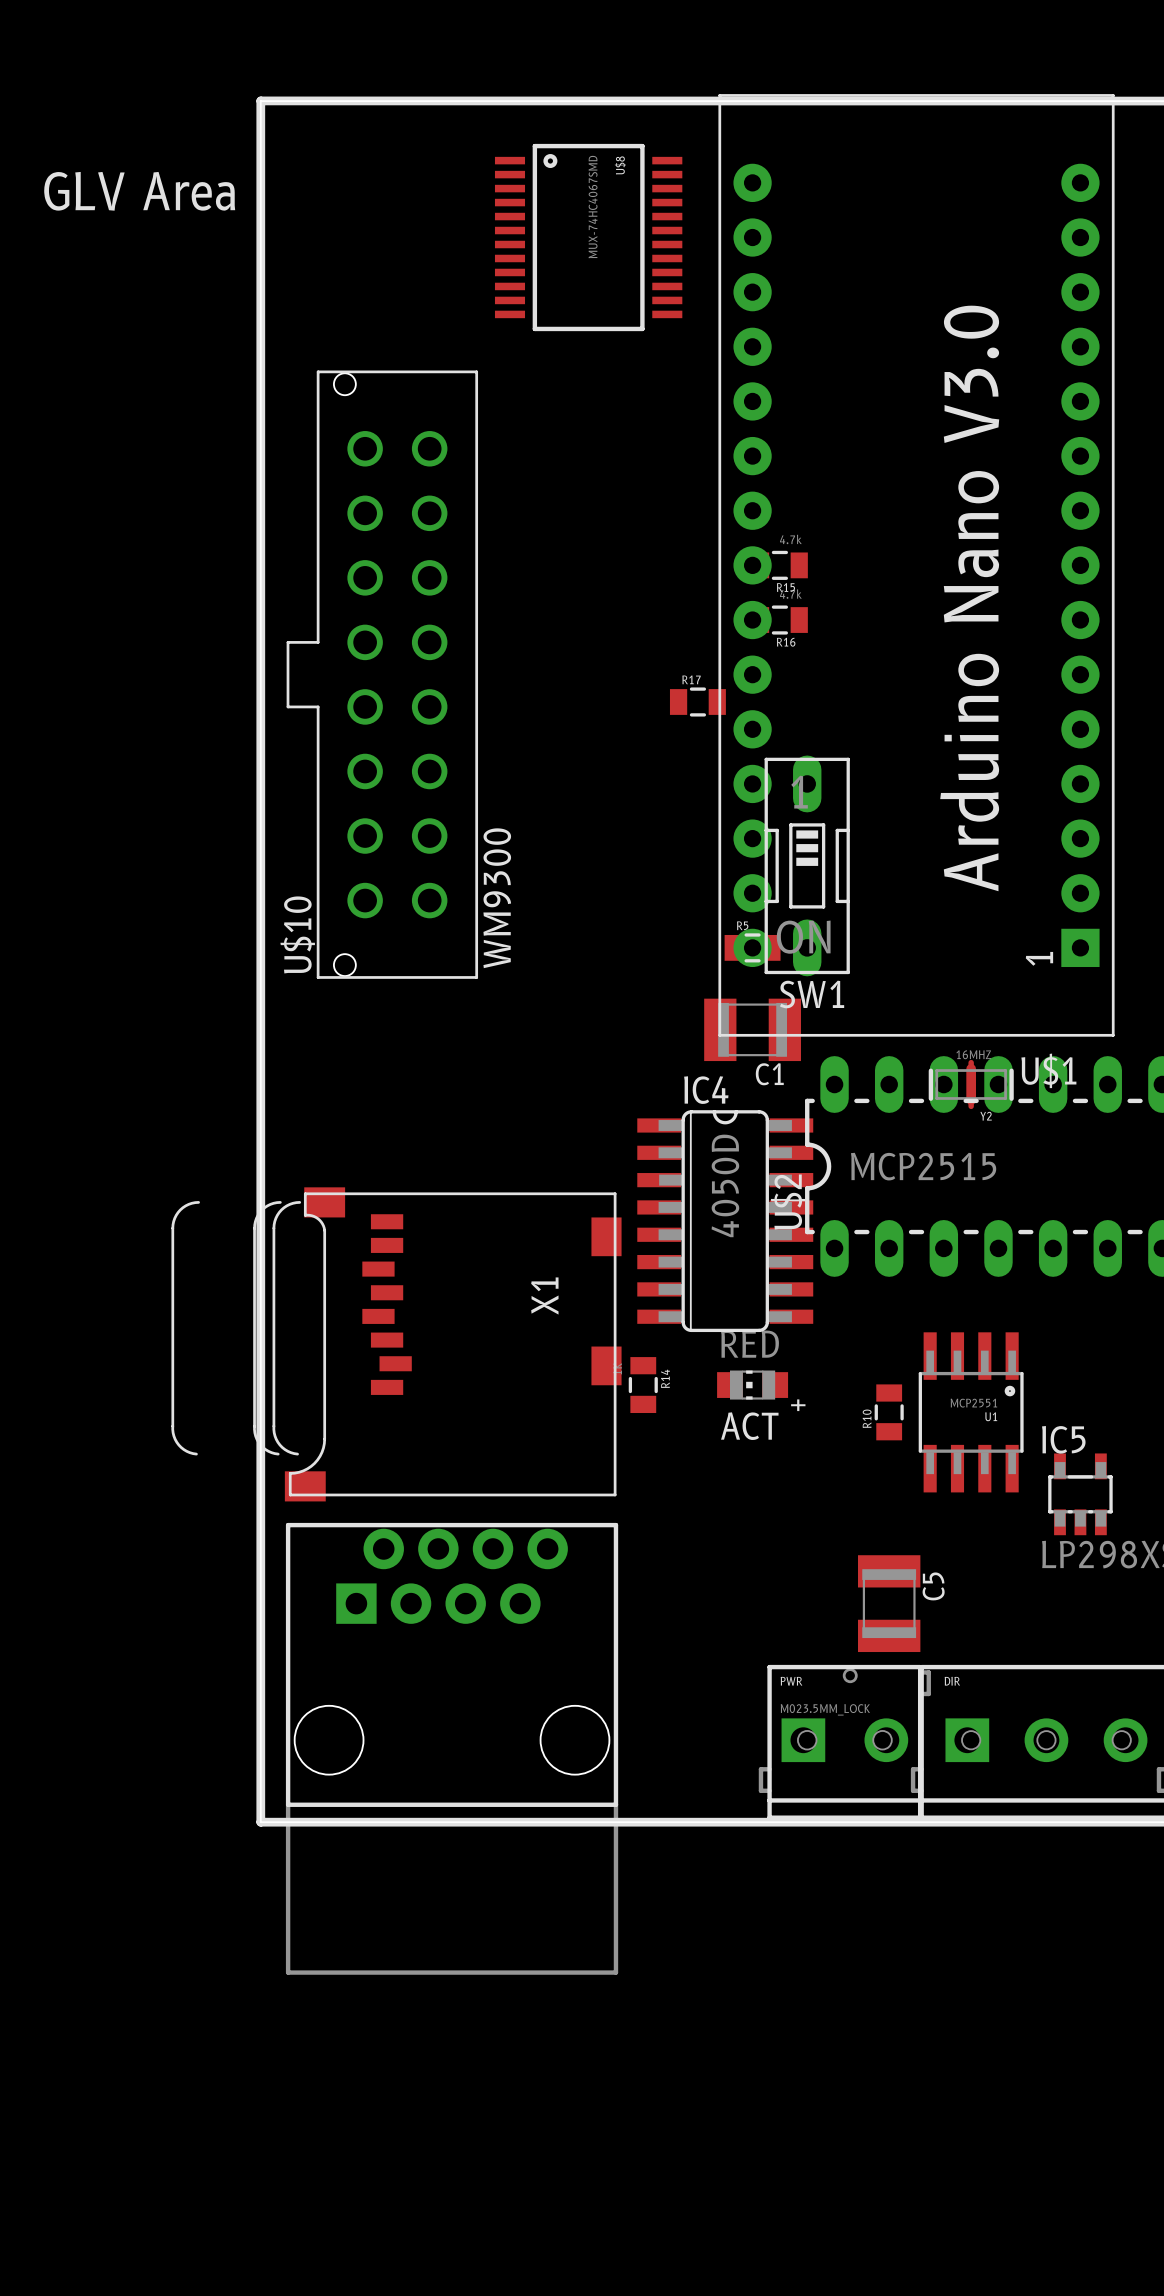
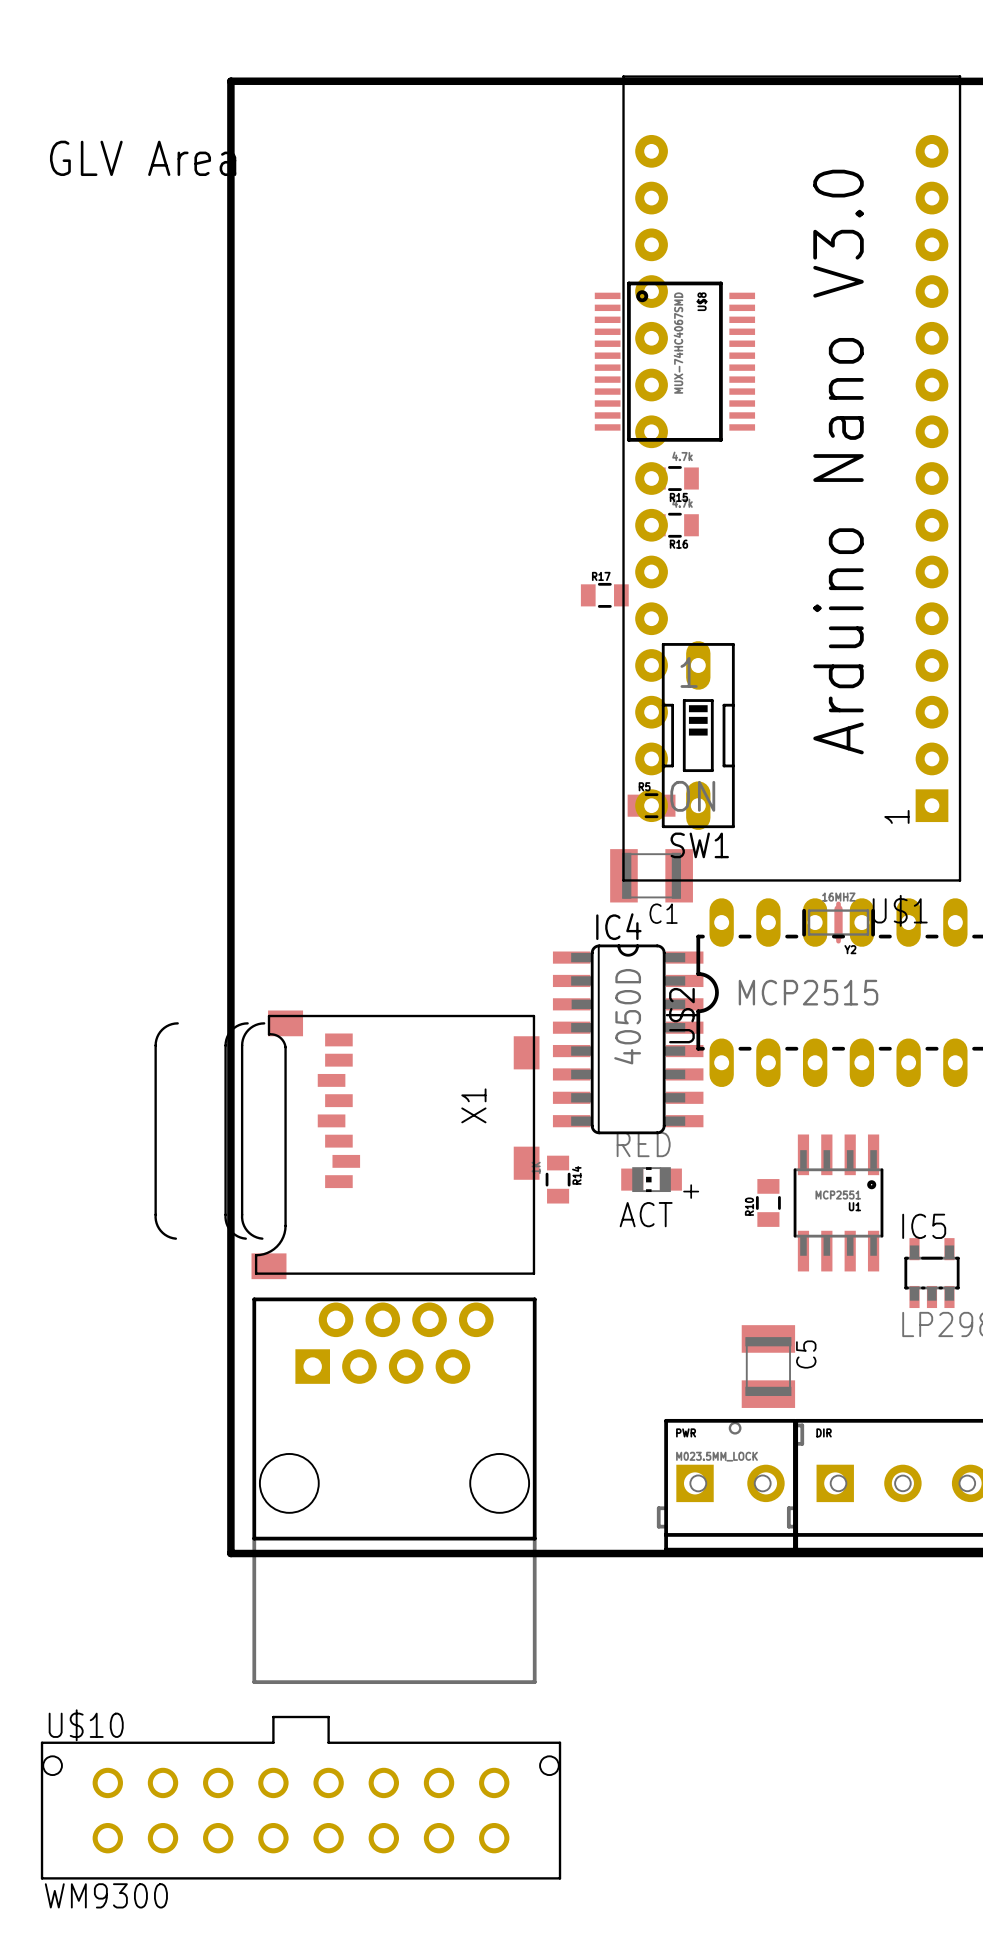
U$8 position: (588, 237) -> (674, 361)
U$10 rotation: 0° (382, 674) -> 90° clockwise (301, 1797)
U$10 position: (382, 674) -> (301, 1797)

